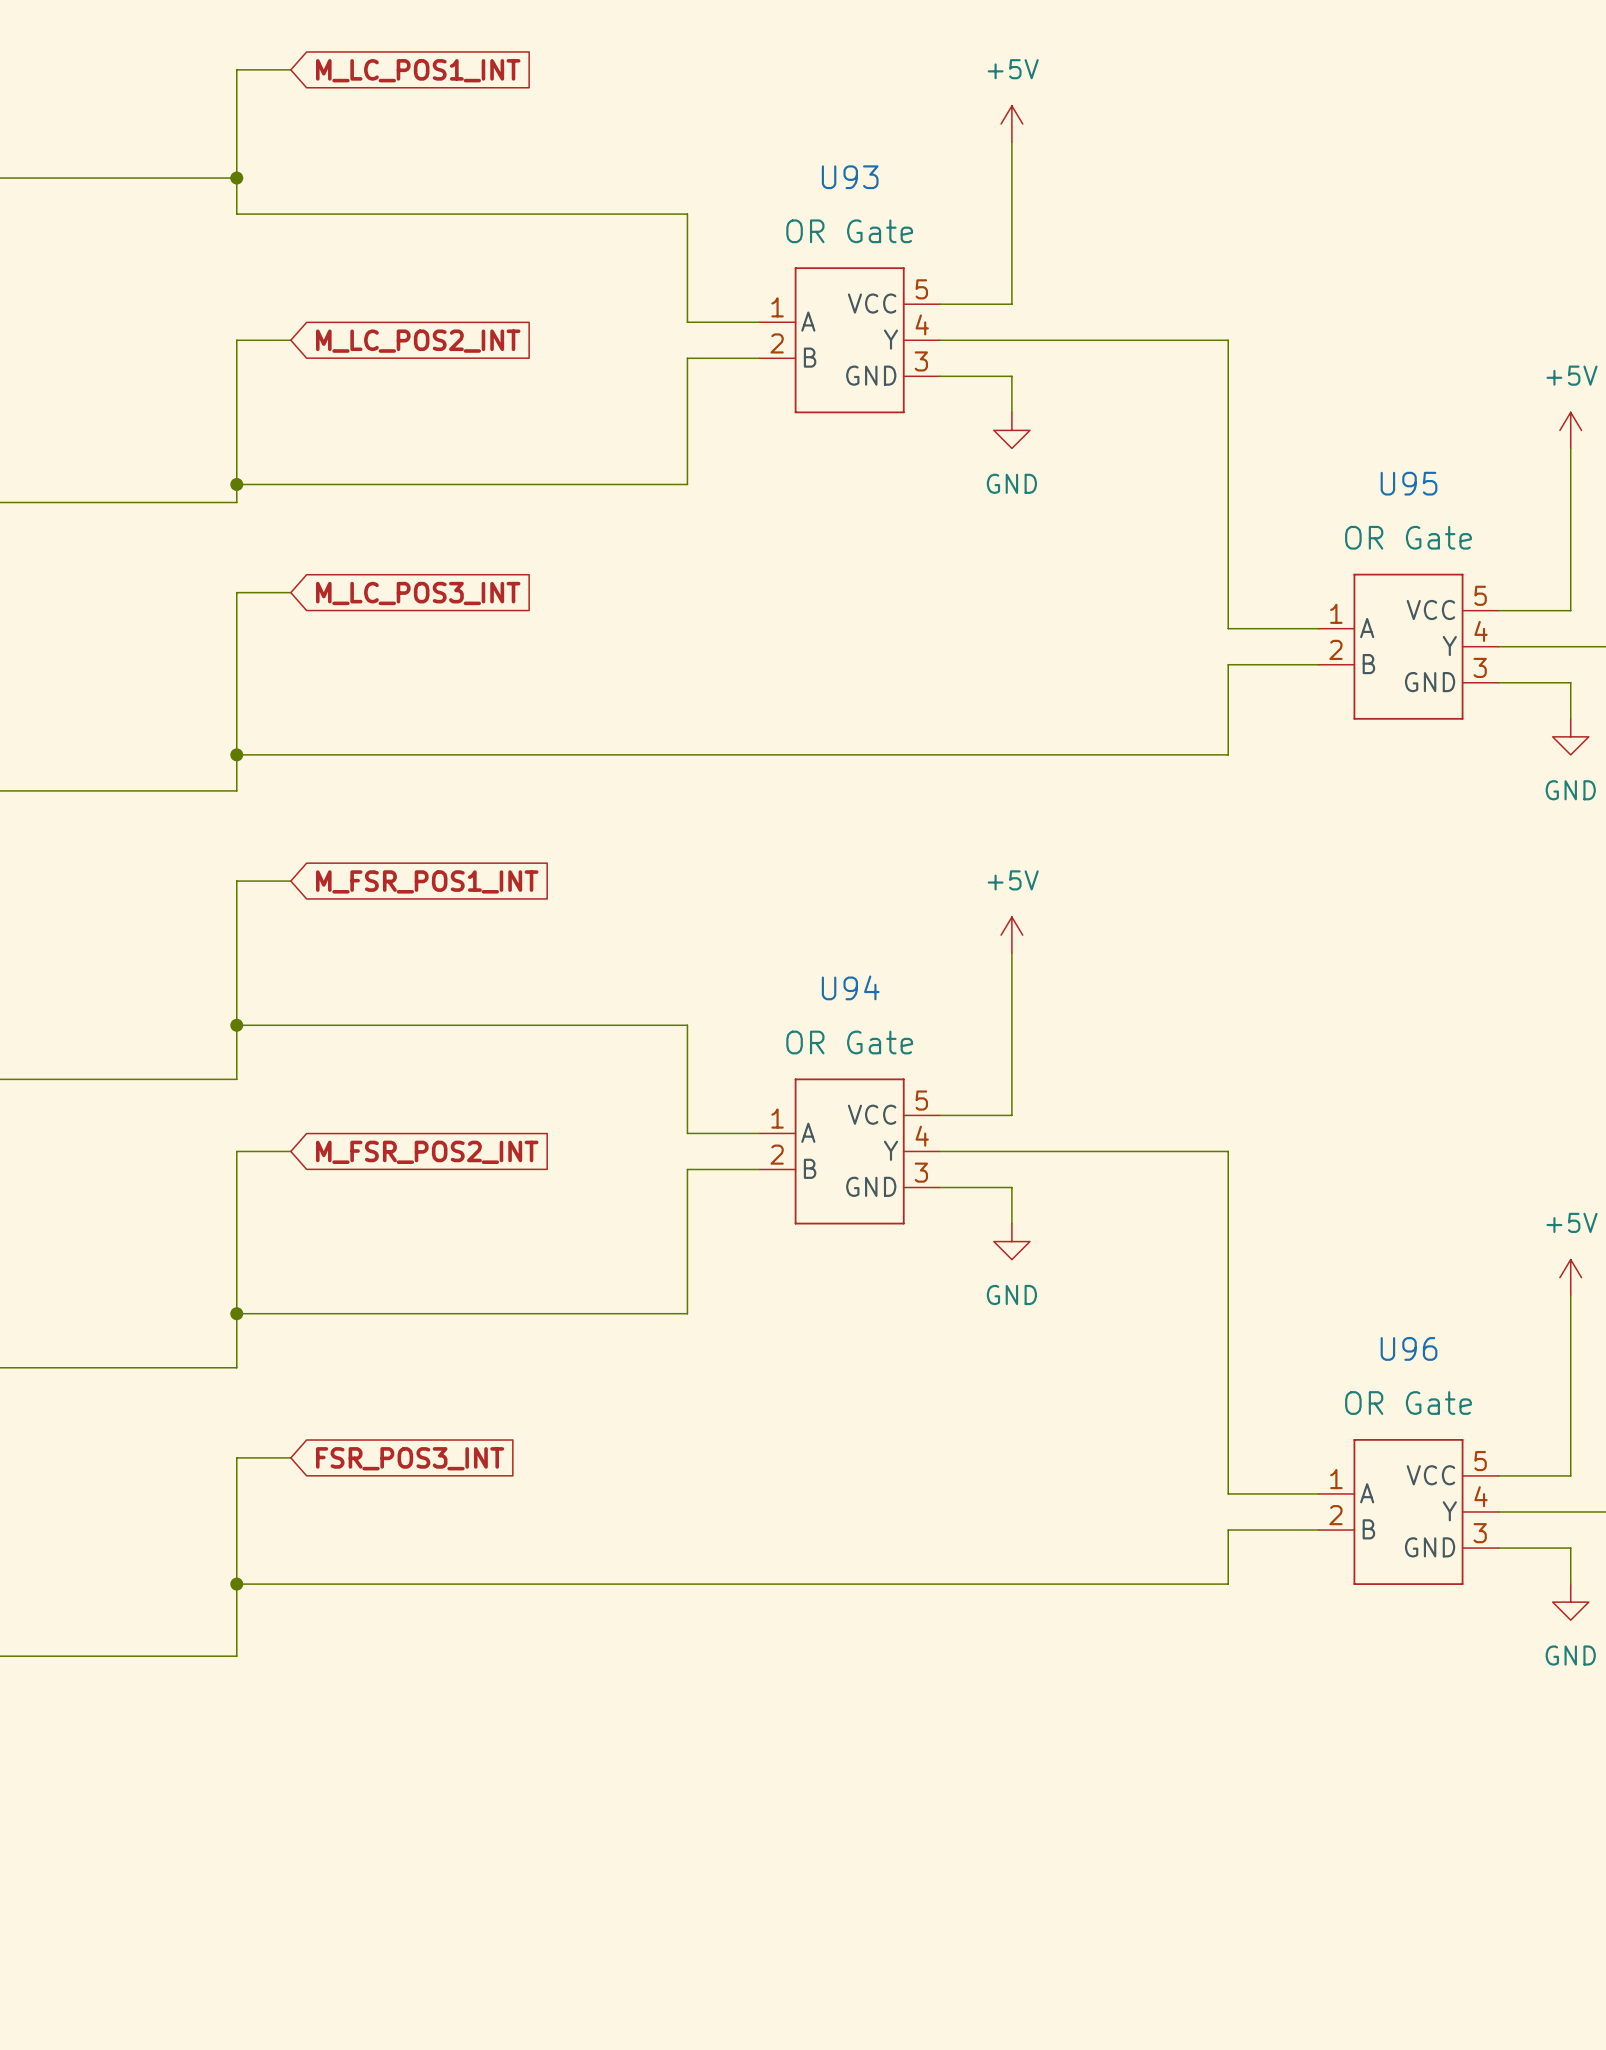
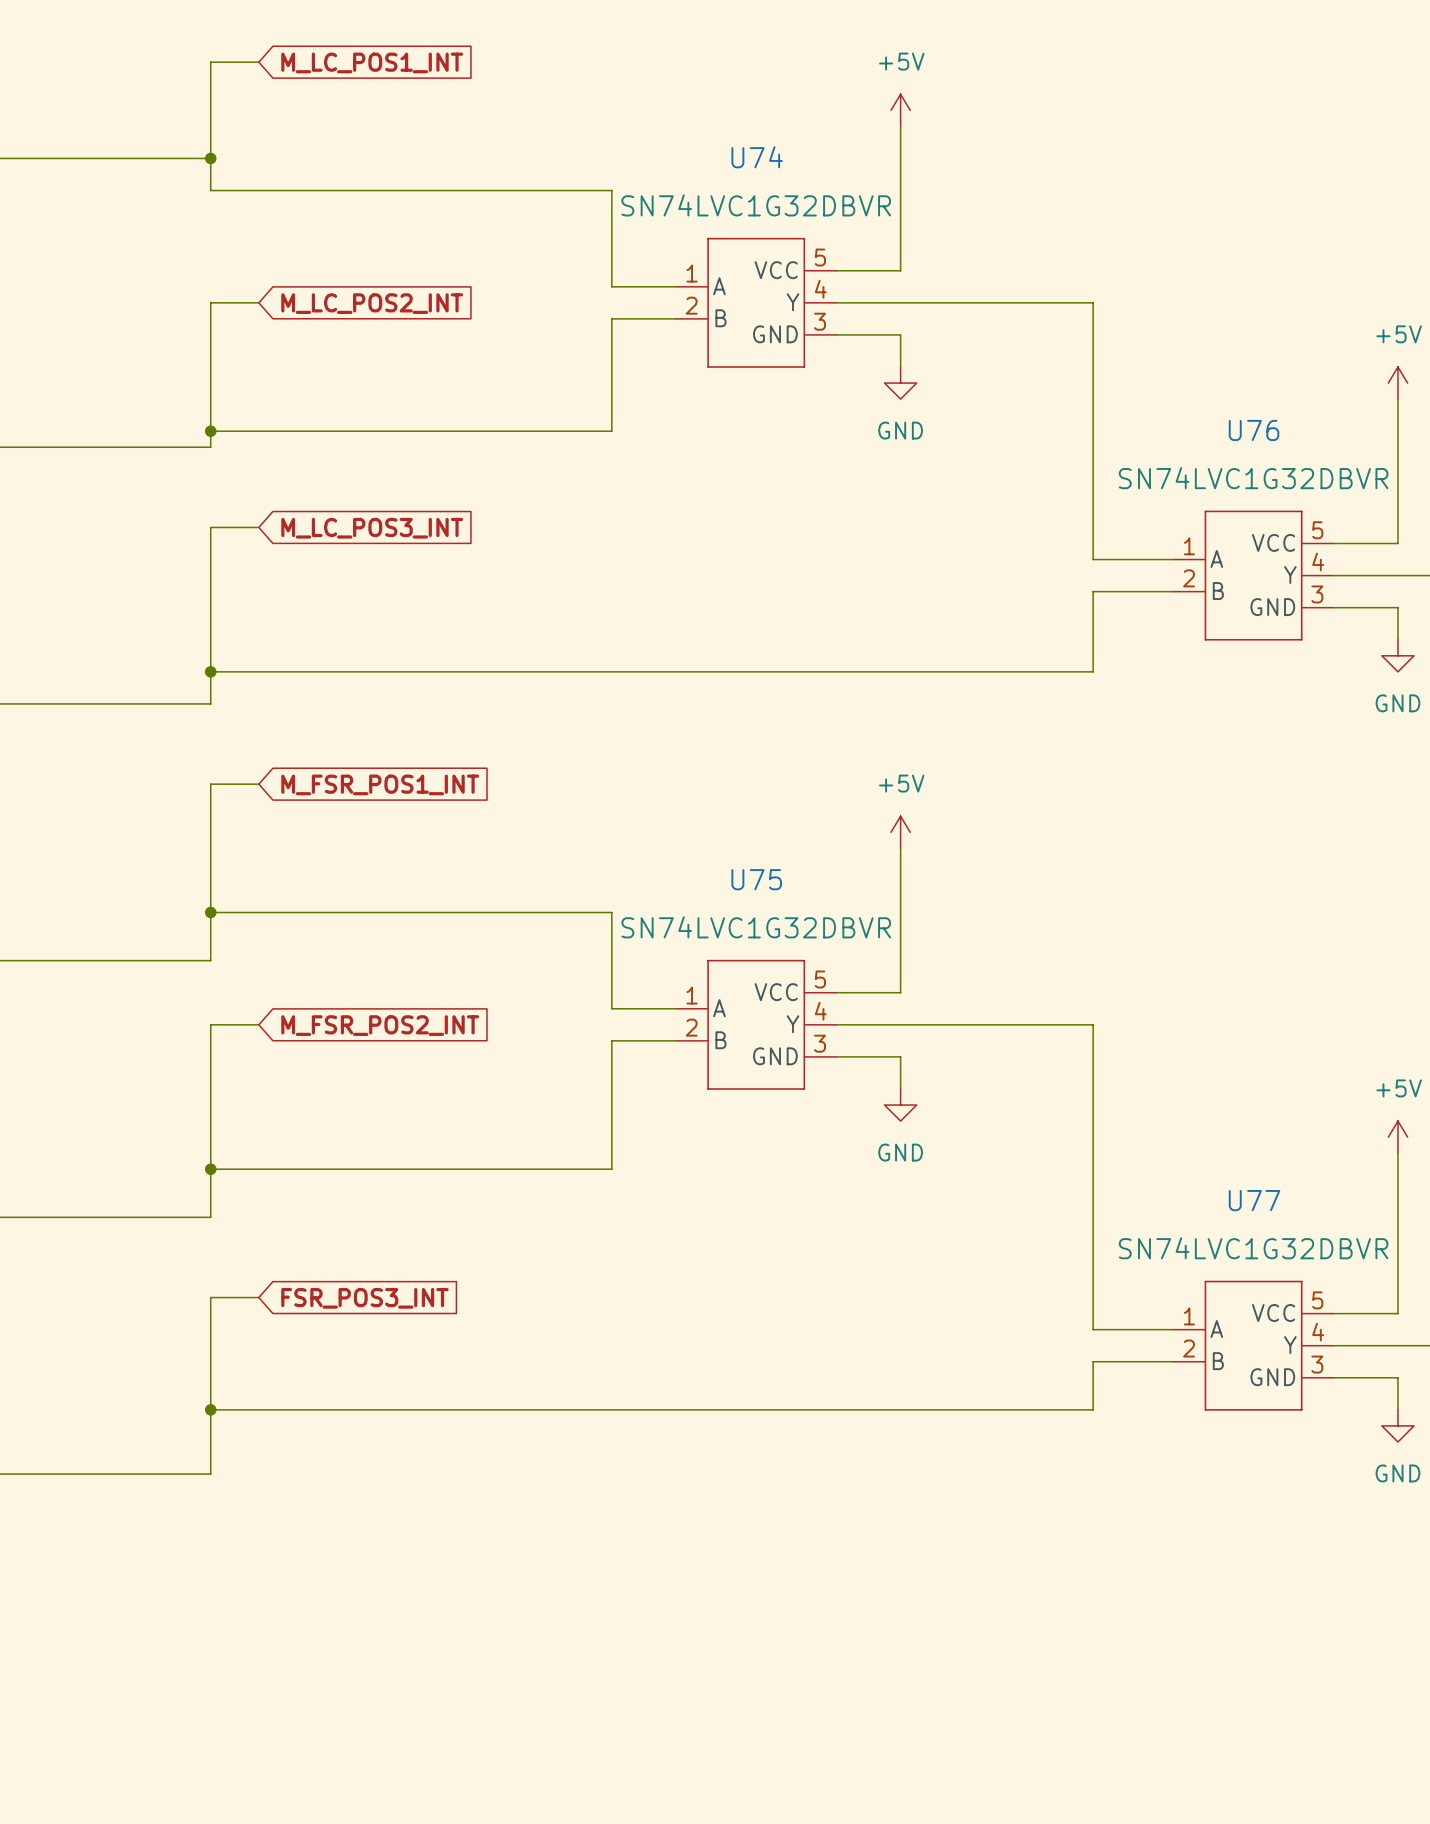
U93 name: U93 (850, 177) -> U74 (757, 157)
U93 value: OR Gate (849, 231) -> SN74LVC1G32DBVR (756, 205)
U95 name: U95 (1409, 483) -> U76 (1254, 430)
U95 value: OR Gate (1408, 537) -> SN74LVC1G32DBVR (1253, 478)
U94 name: U94 (850, 987) -> U75 (756, 879)
U94 value: OR Gate (849, 1042) -> SN74LVC1G32DBVR (756, 927)
U96 name: U96 (1409, 1348) -> U77 (1254, 1200)
U96 value: OR Gate (1408, 1403) -> SN74LVC1G32DBVR (1253, 1248)

